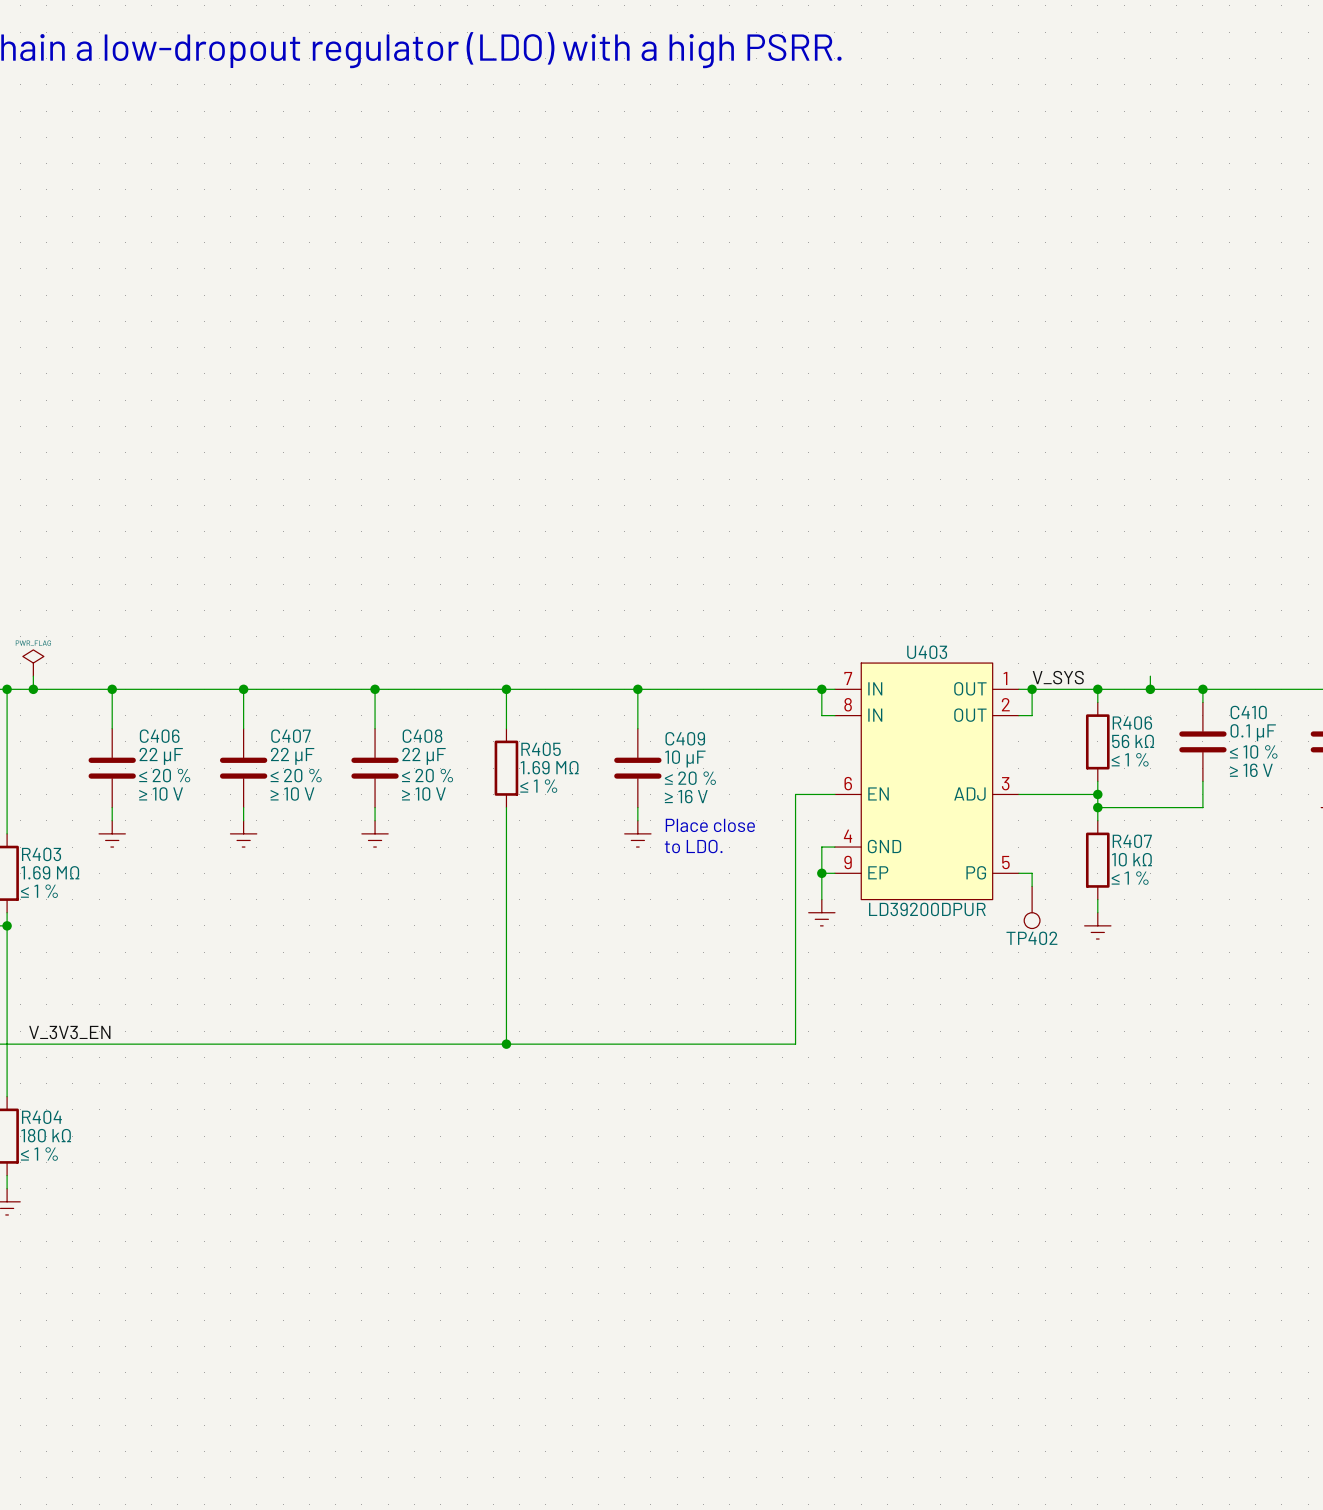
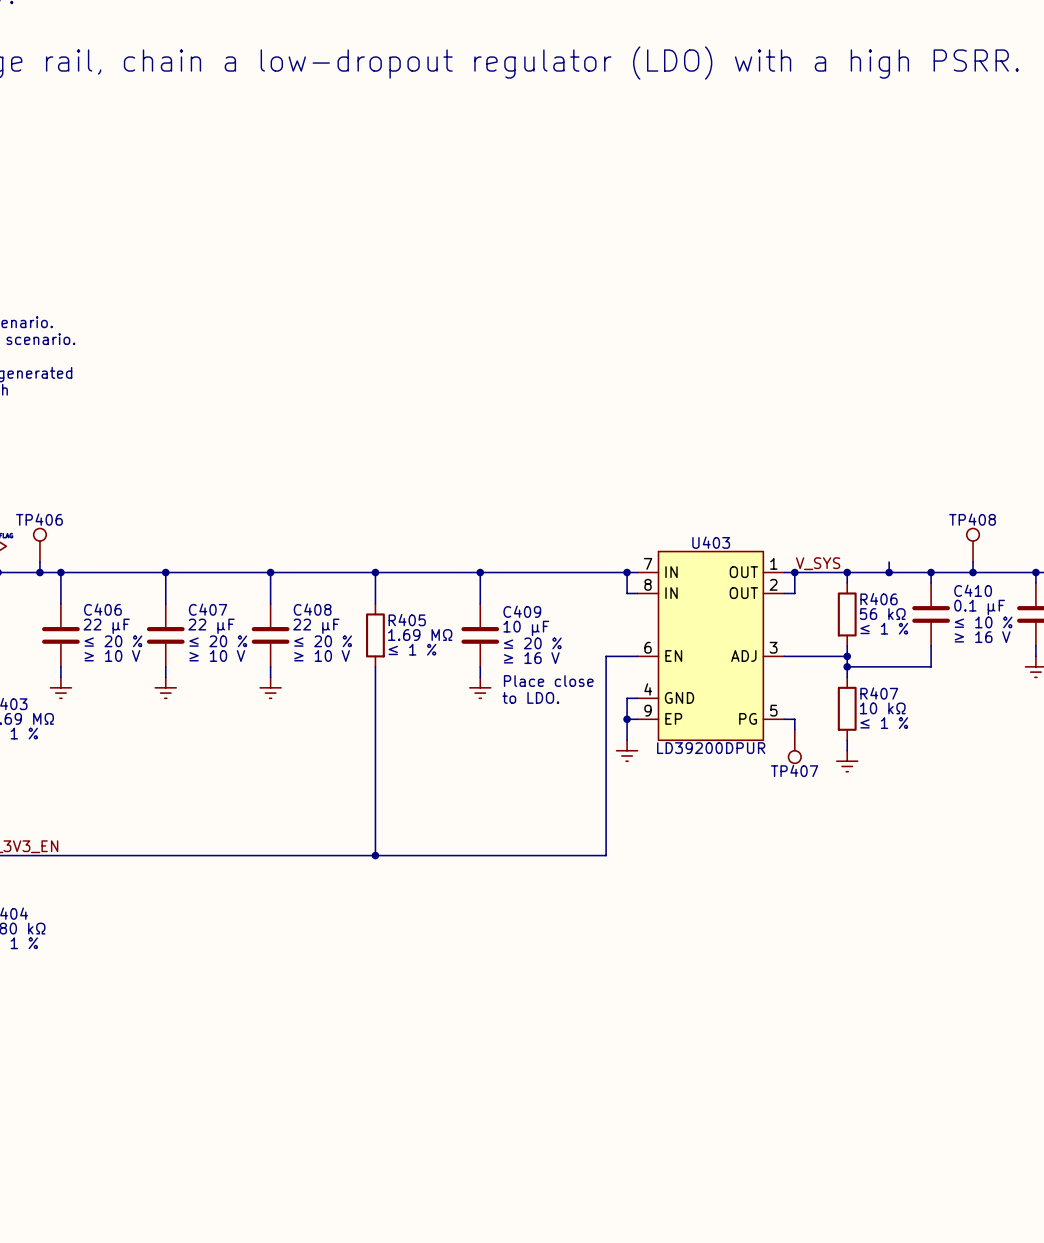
TP406: none -> (39, 545)
TP408: none -> (973, 545)
wire: none -> (39, 562) (39, 572)
wire: none -> (973, 562) (973, 572)
junction: none -> (39, 572)
junction: none -> (973, 572)
TP402 name: TP402 (1031, 938) -> TP407 (794, 770)

